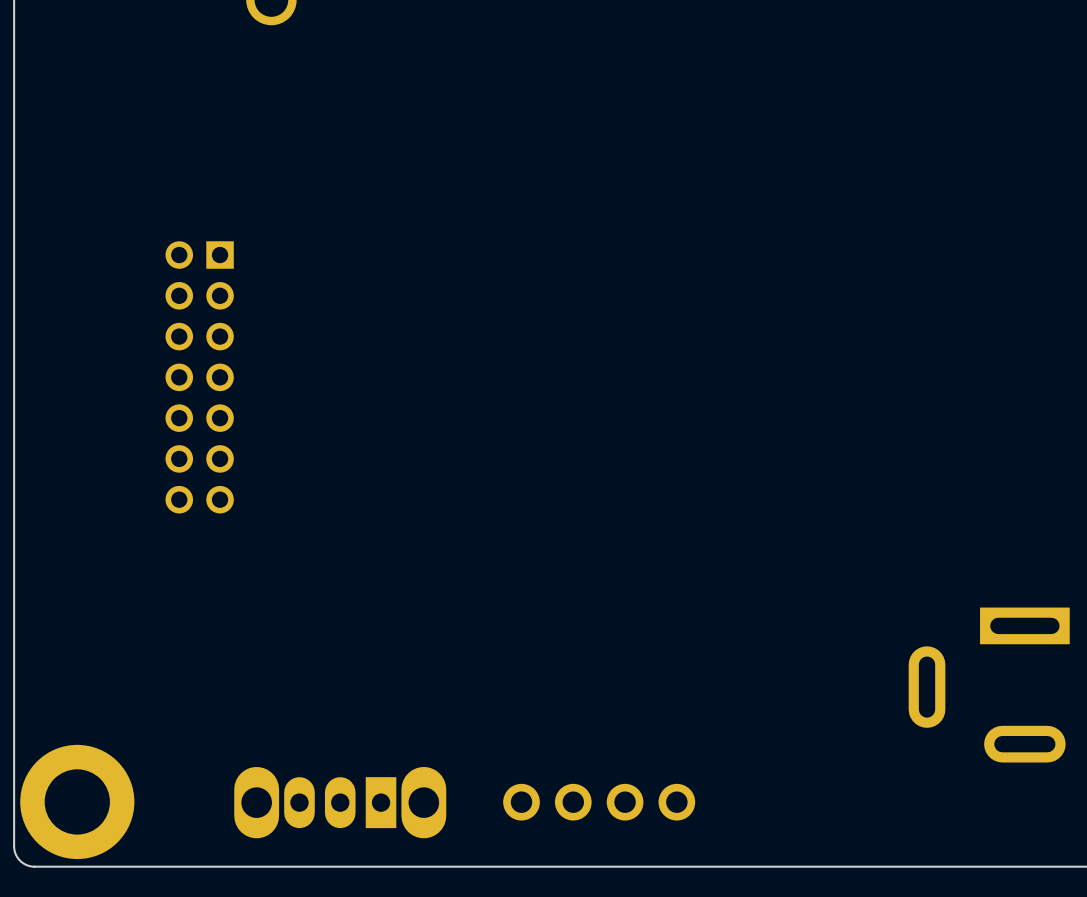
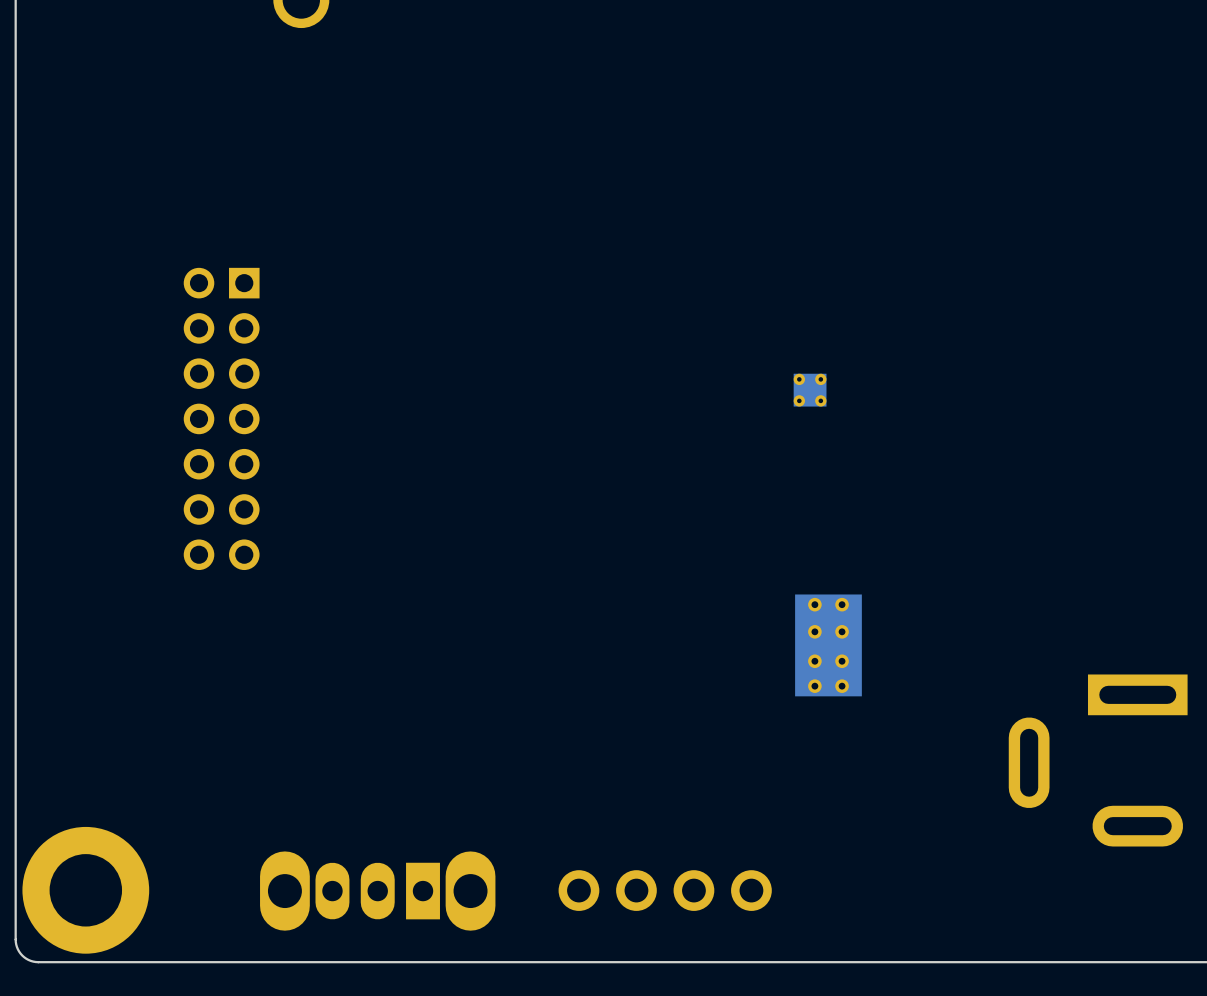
part: none -> (810, 390)
part: none -> (828, 645)

